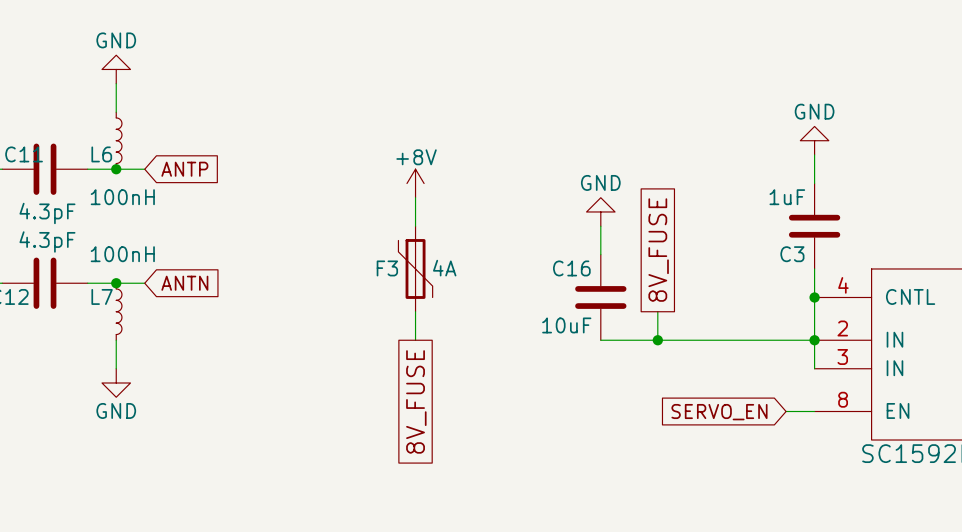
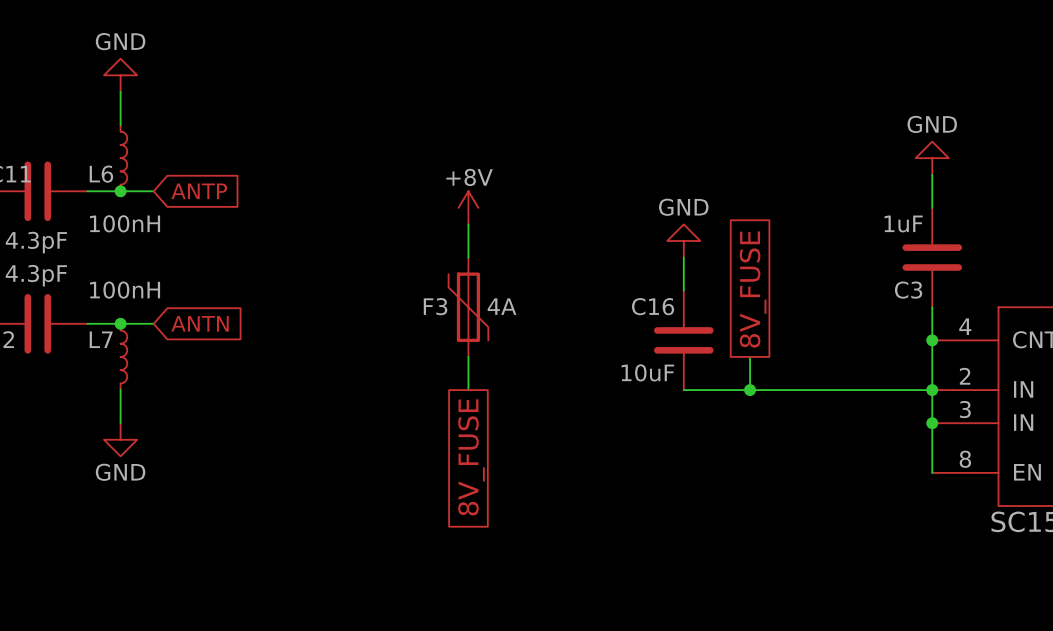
junction: none -> (932, 423)
wire: (786, 411) (814, 411) -> (932, 423) (932, 472)
global label: SERVO_EN (719, 412) -> none

